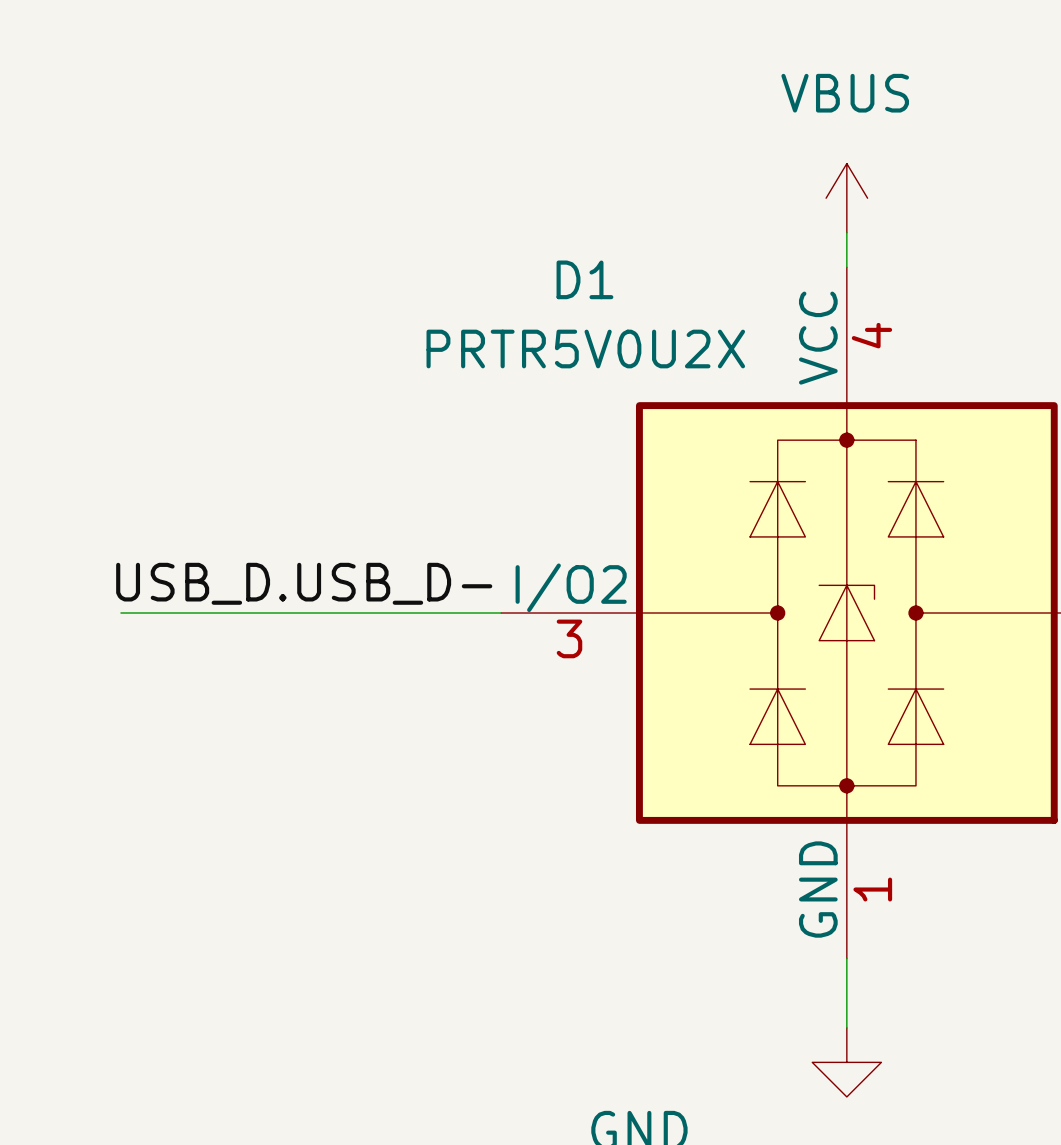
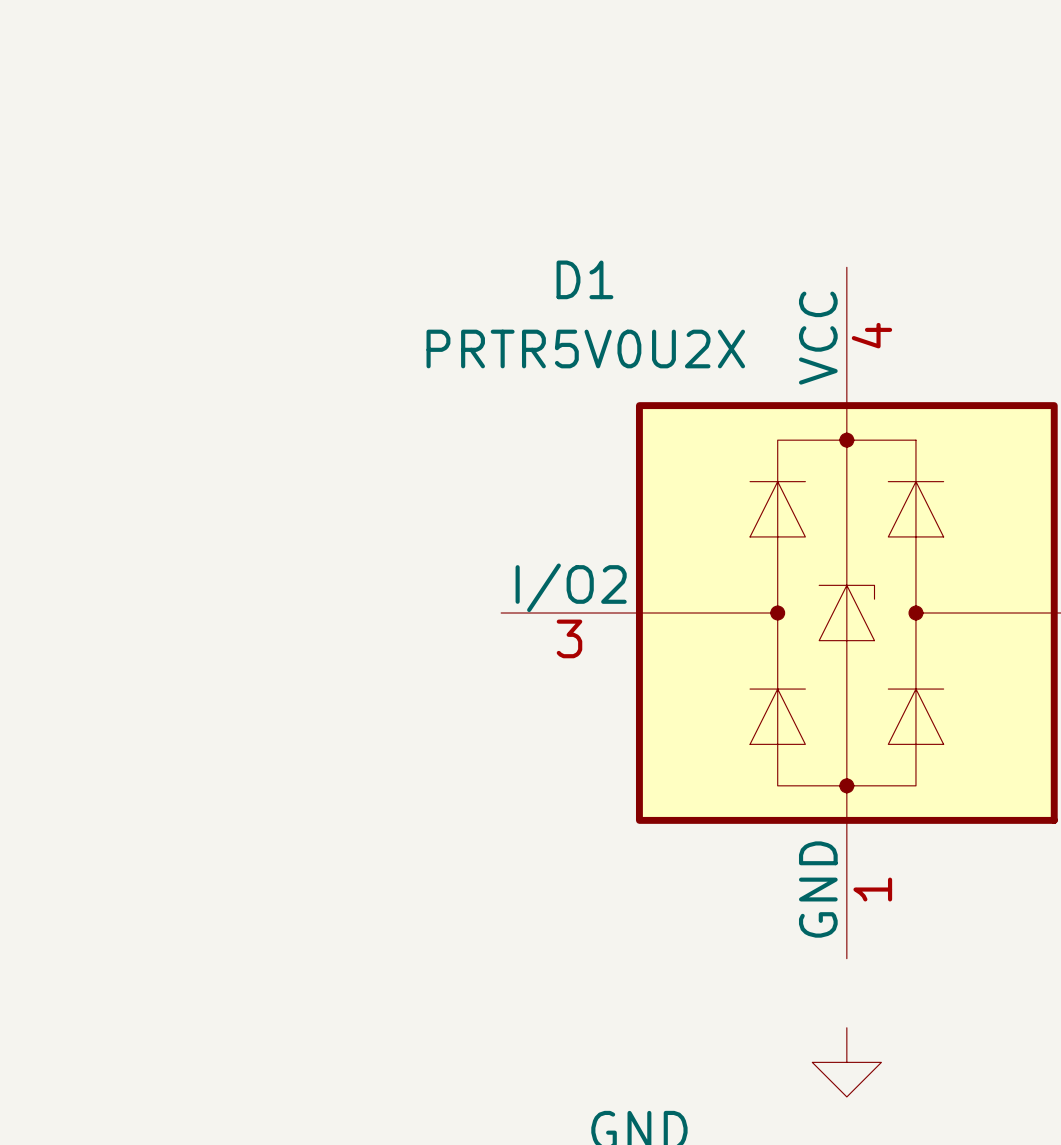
power symbol: VBUS (846, 198) -> none
wire: (846, 232) (846, 267) -> none
label: USB_D.USB_D- (304, 583) -> none
wire: (120, 613) (501, 613) -> none
wire: (846, 958) (846, 1027) -> none

